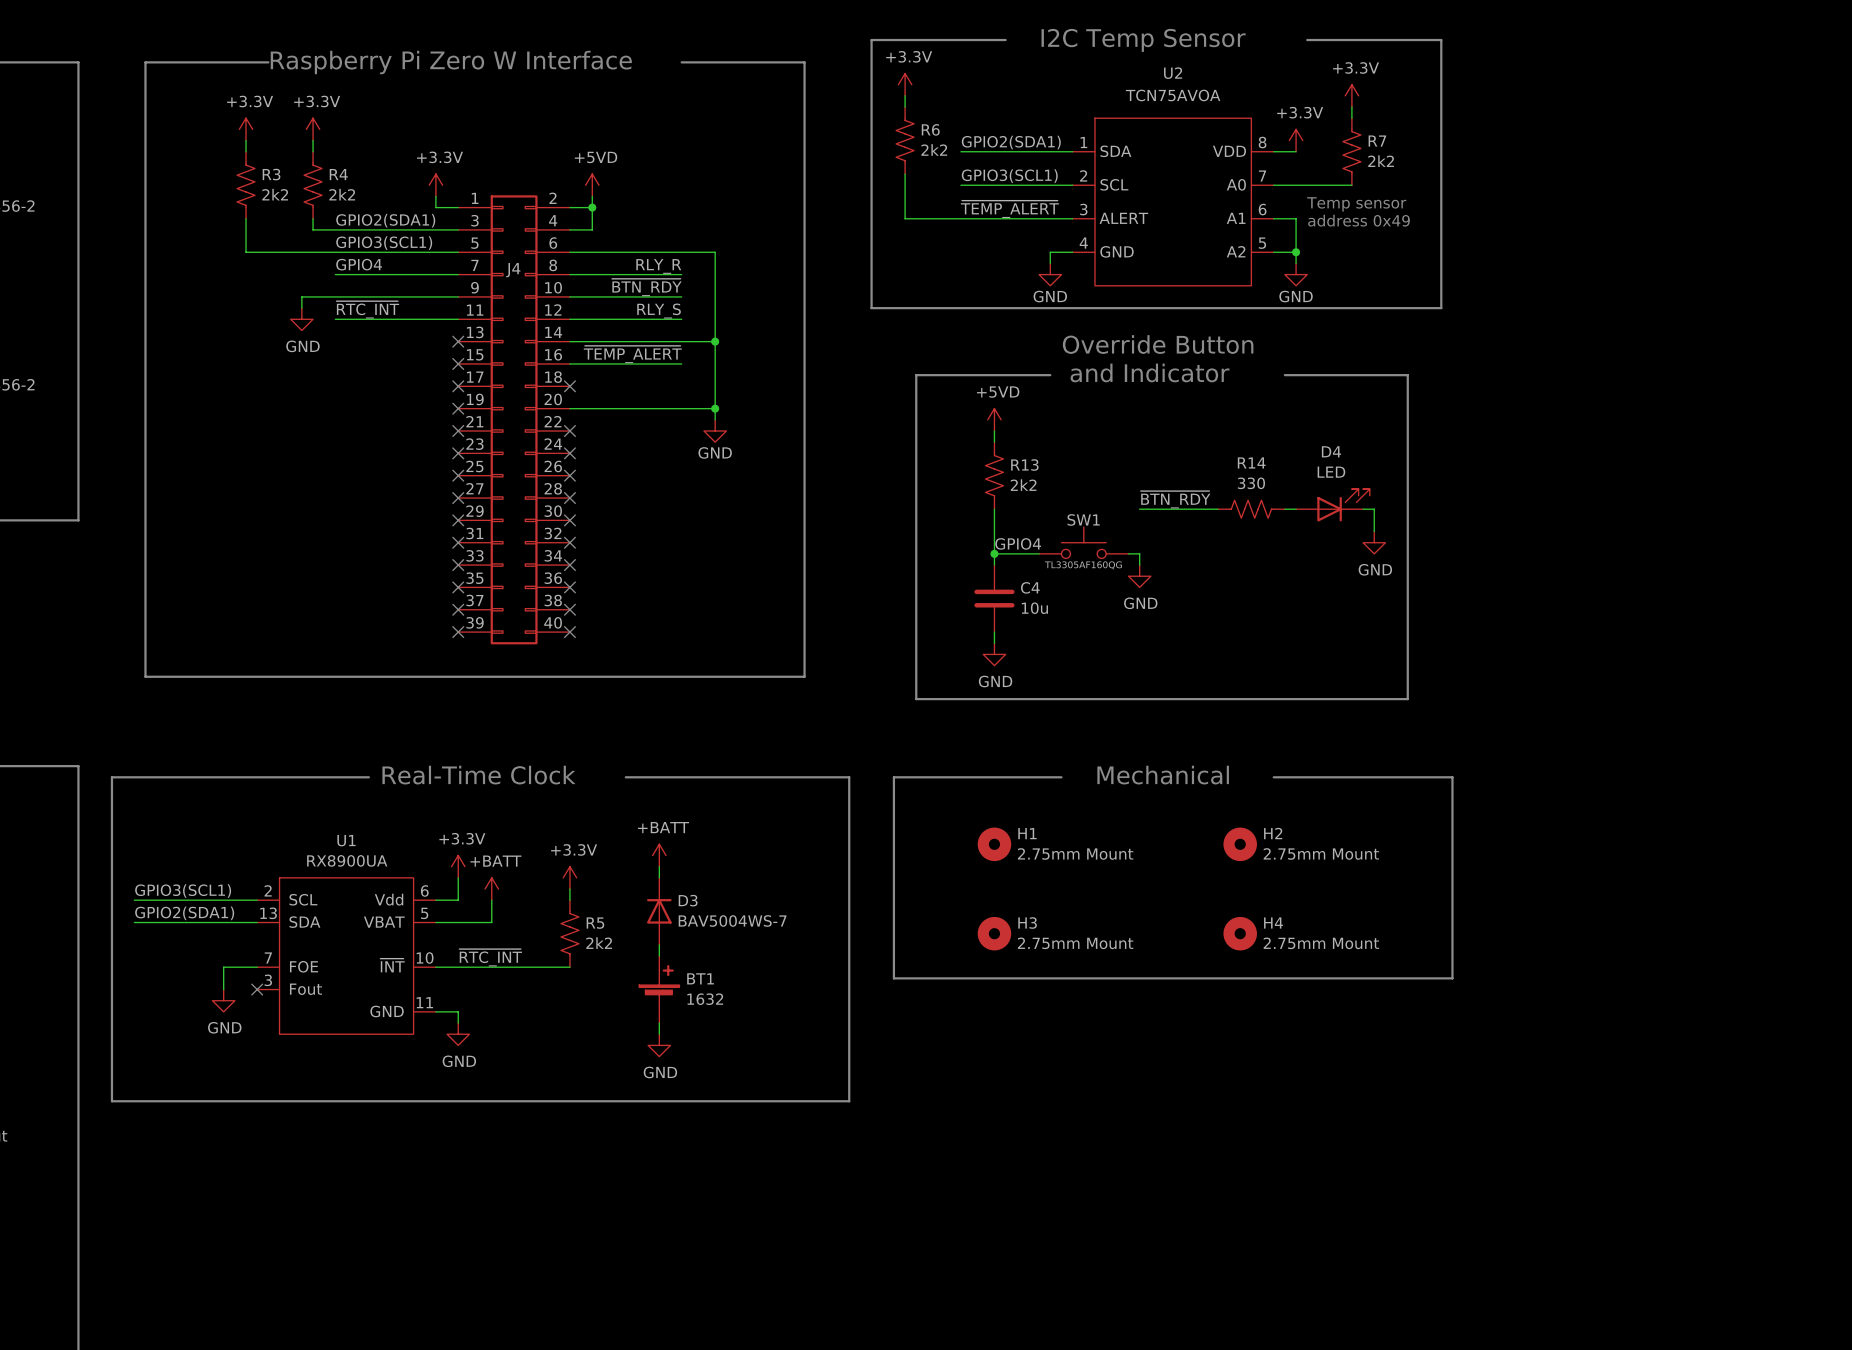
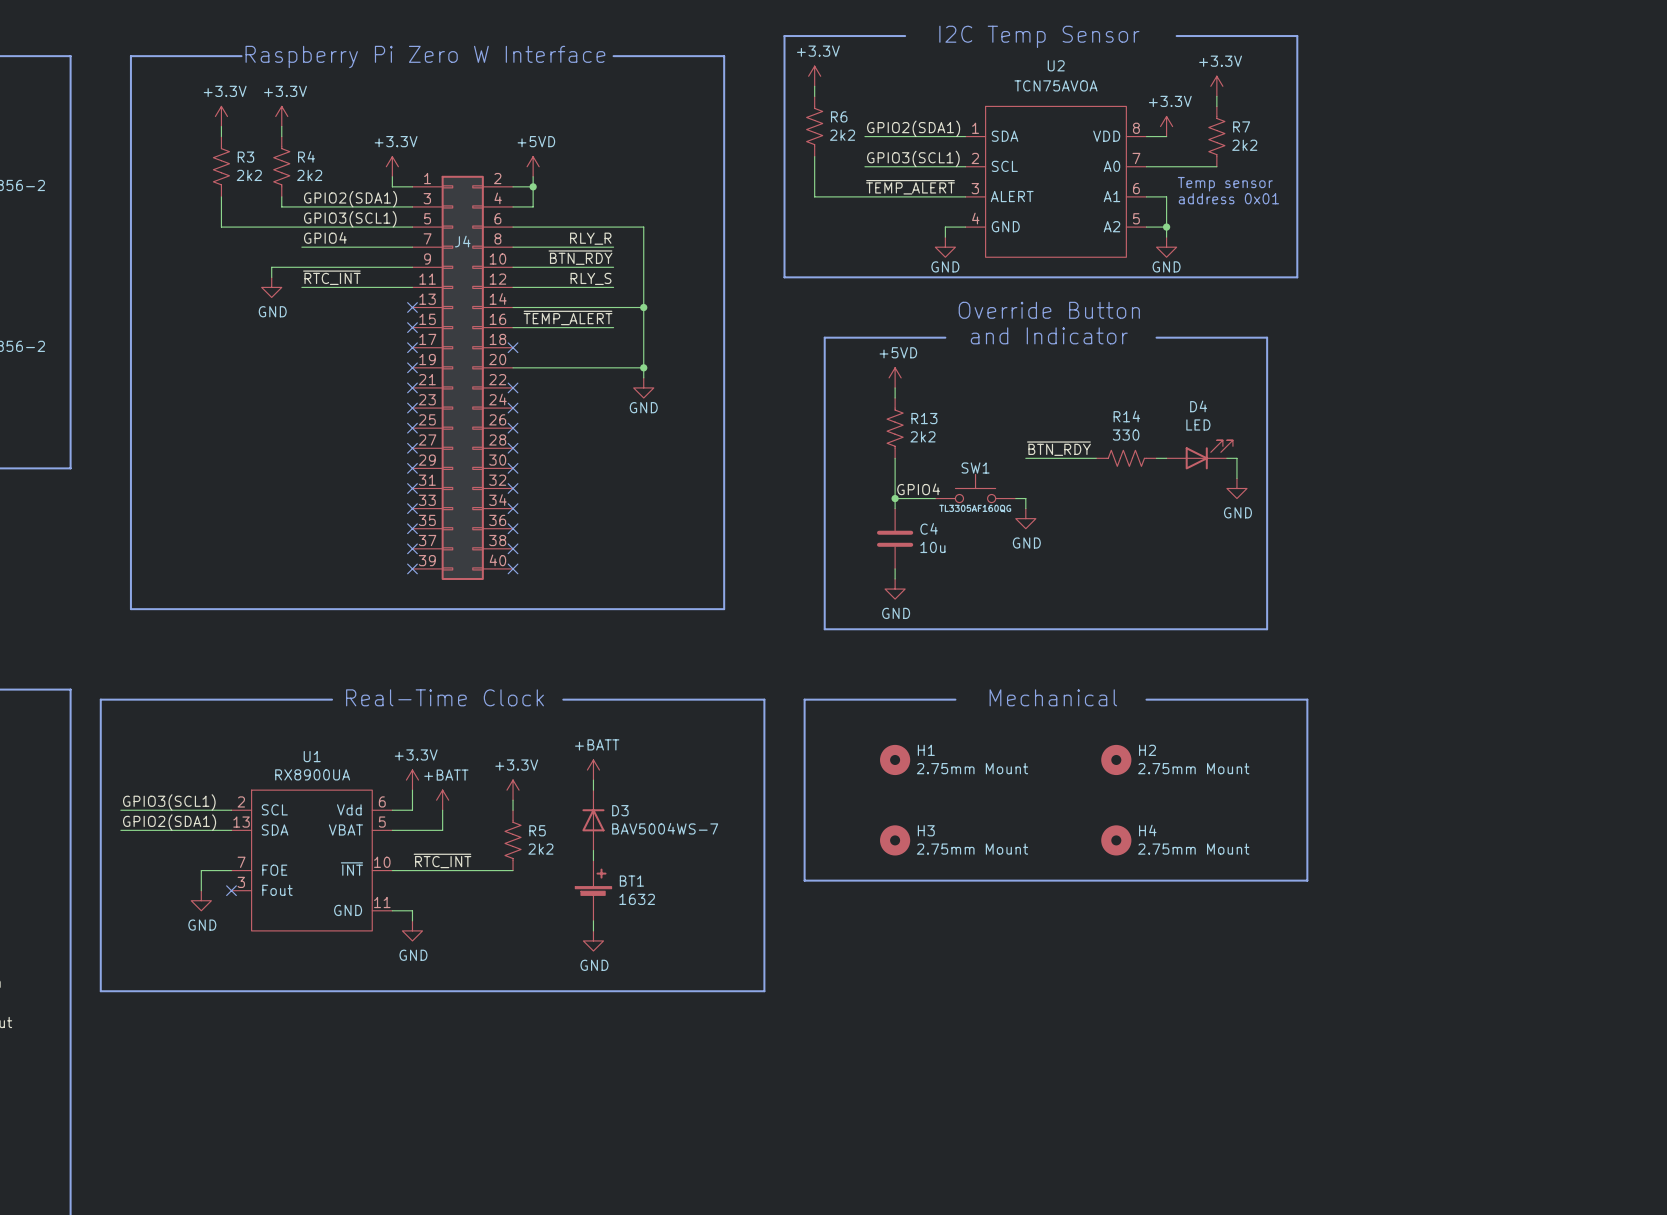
text: address 0x49 (1359, 220) -> address 0x01 (1228, 198)

